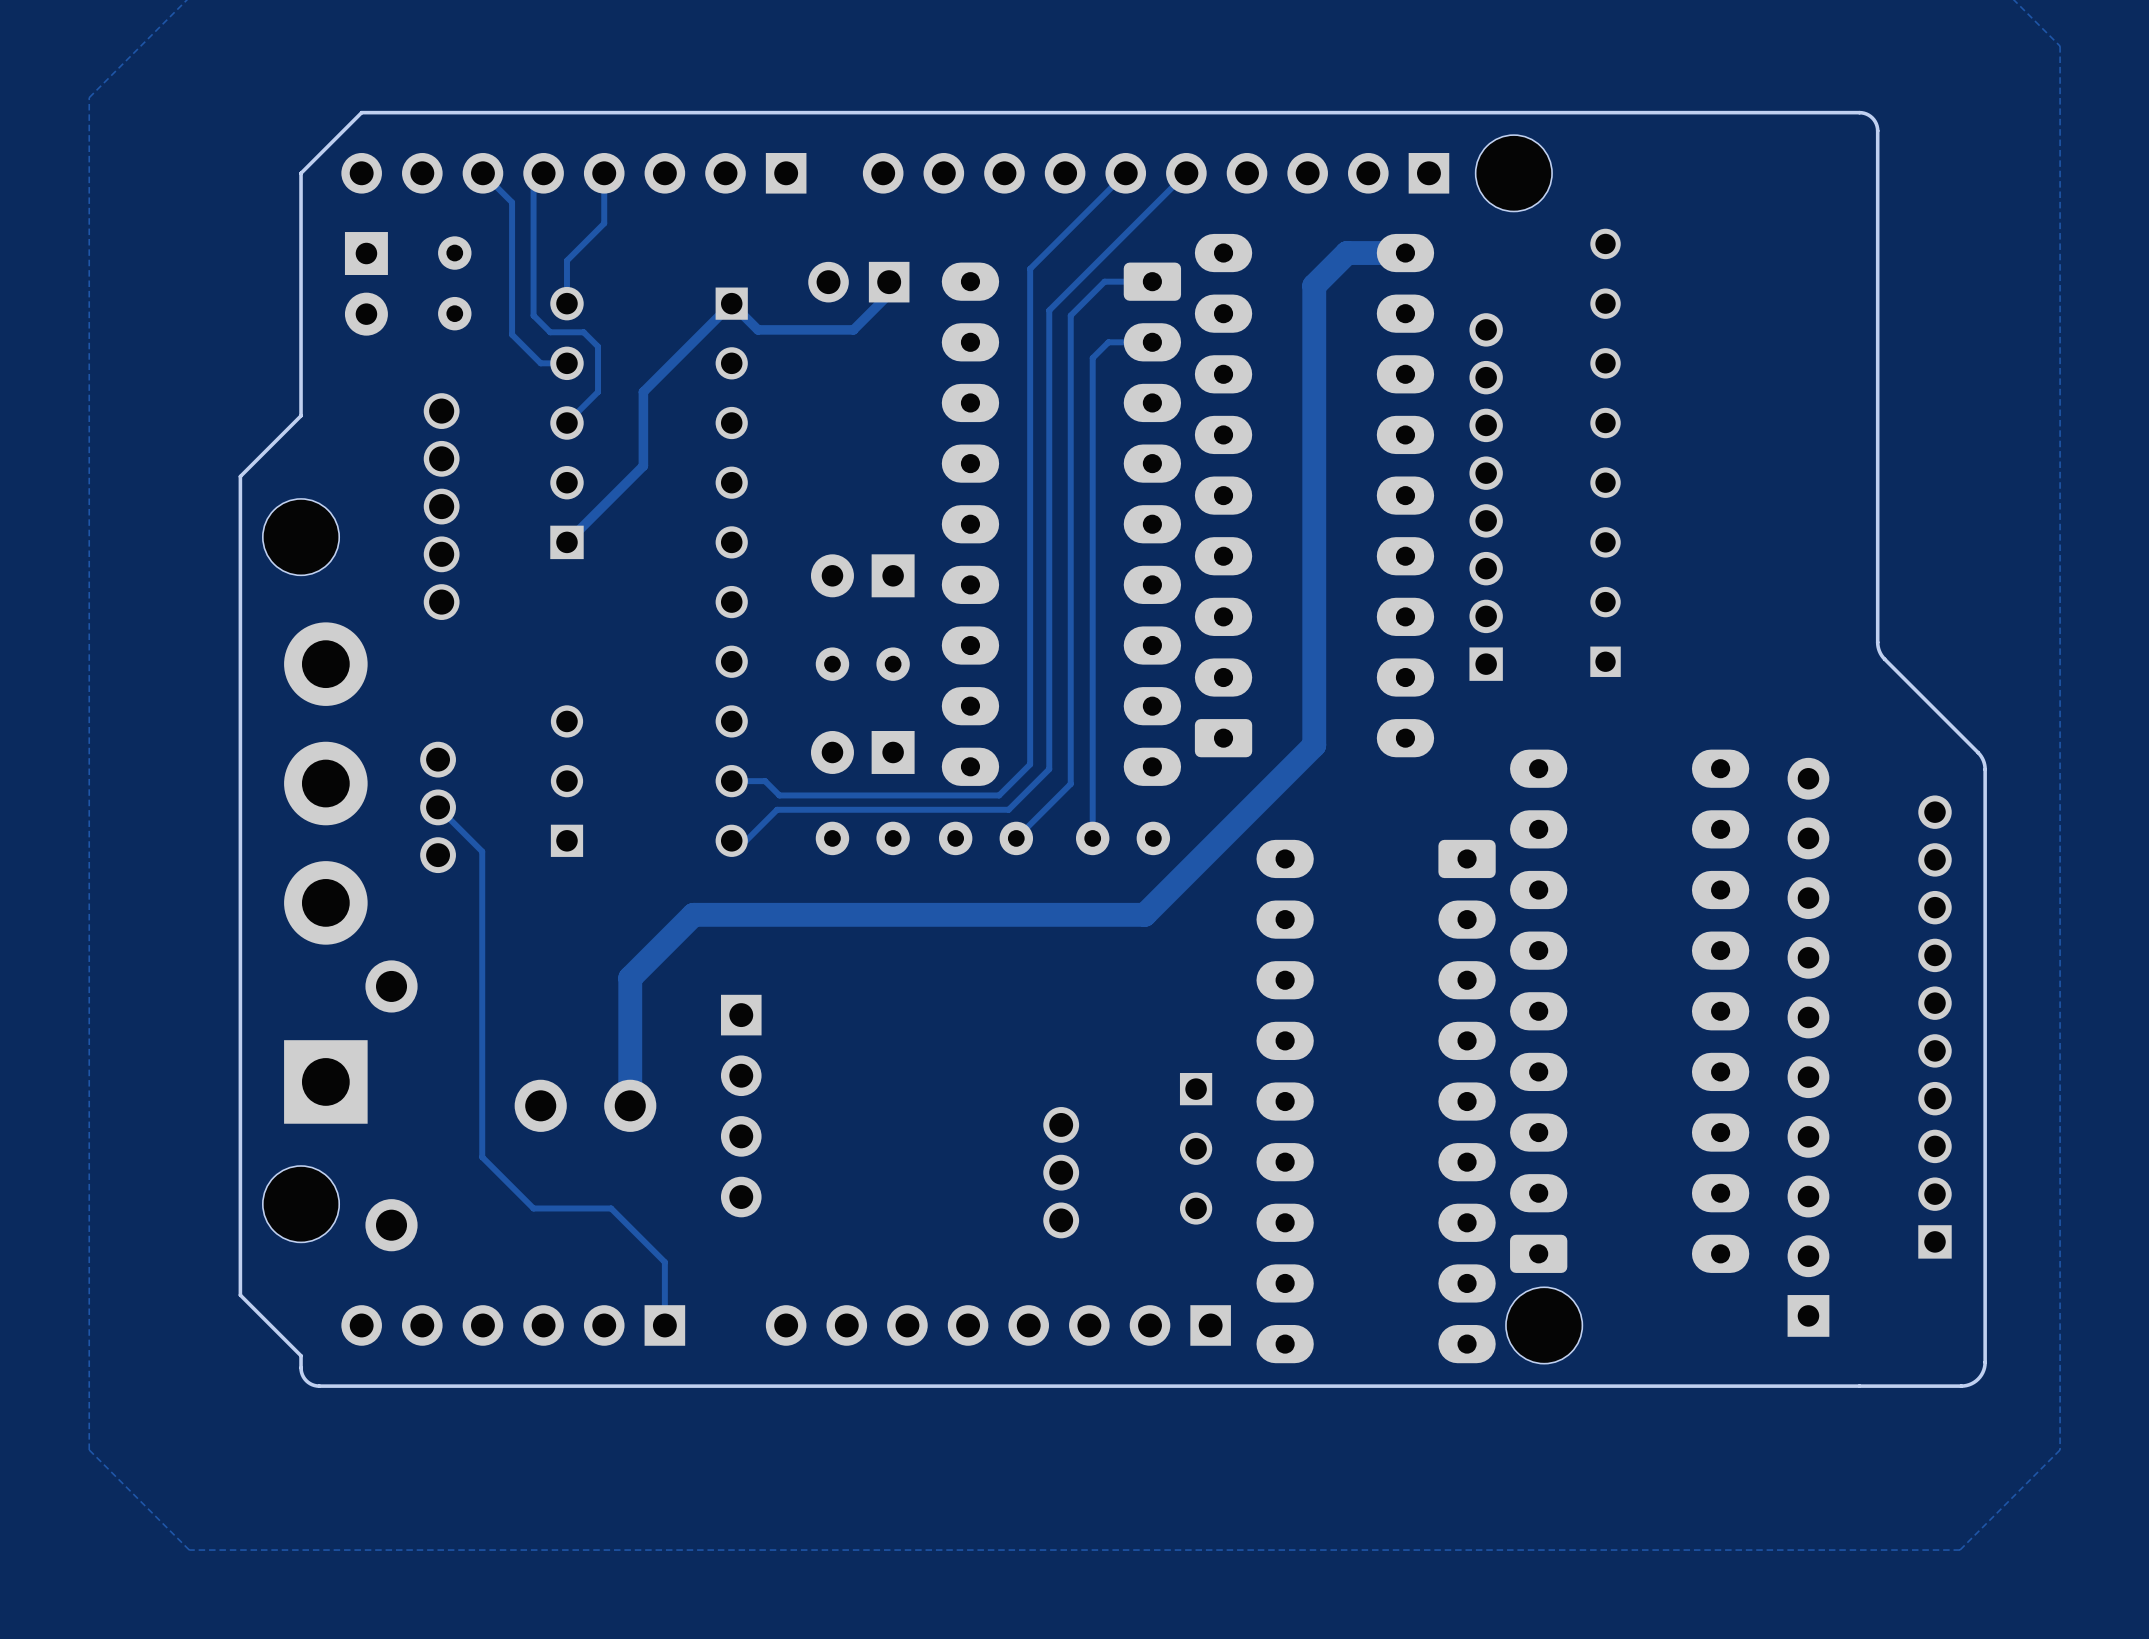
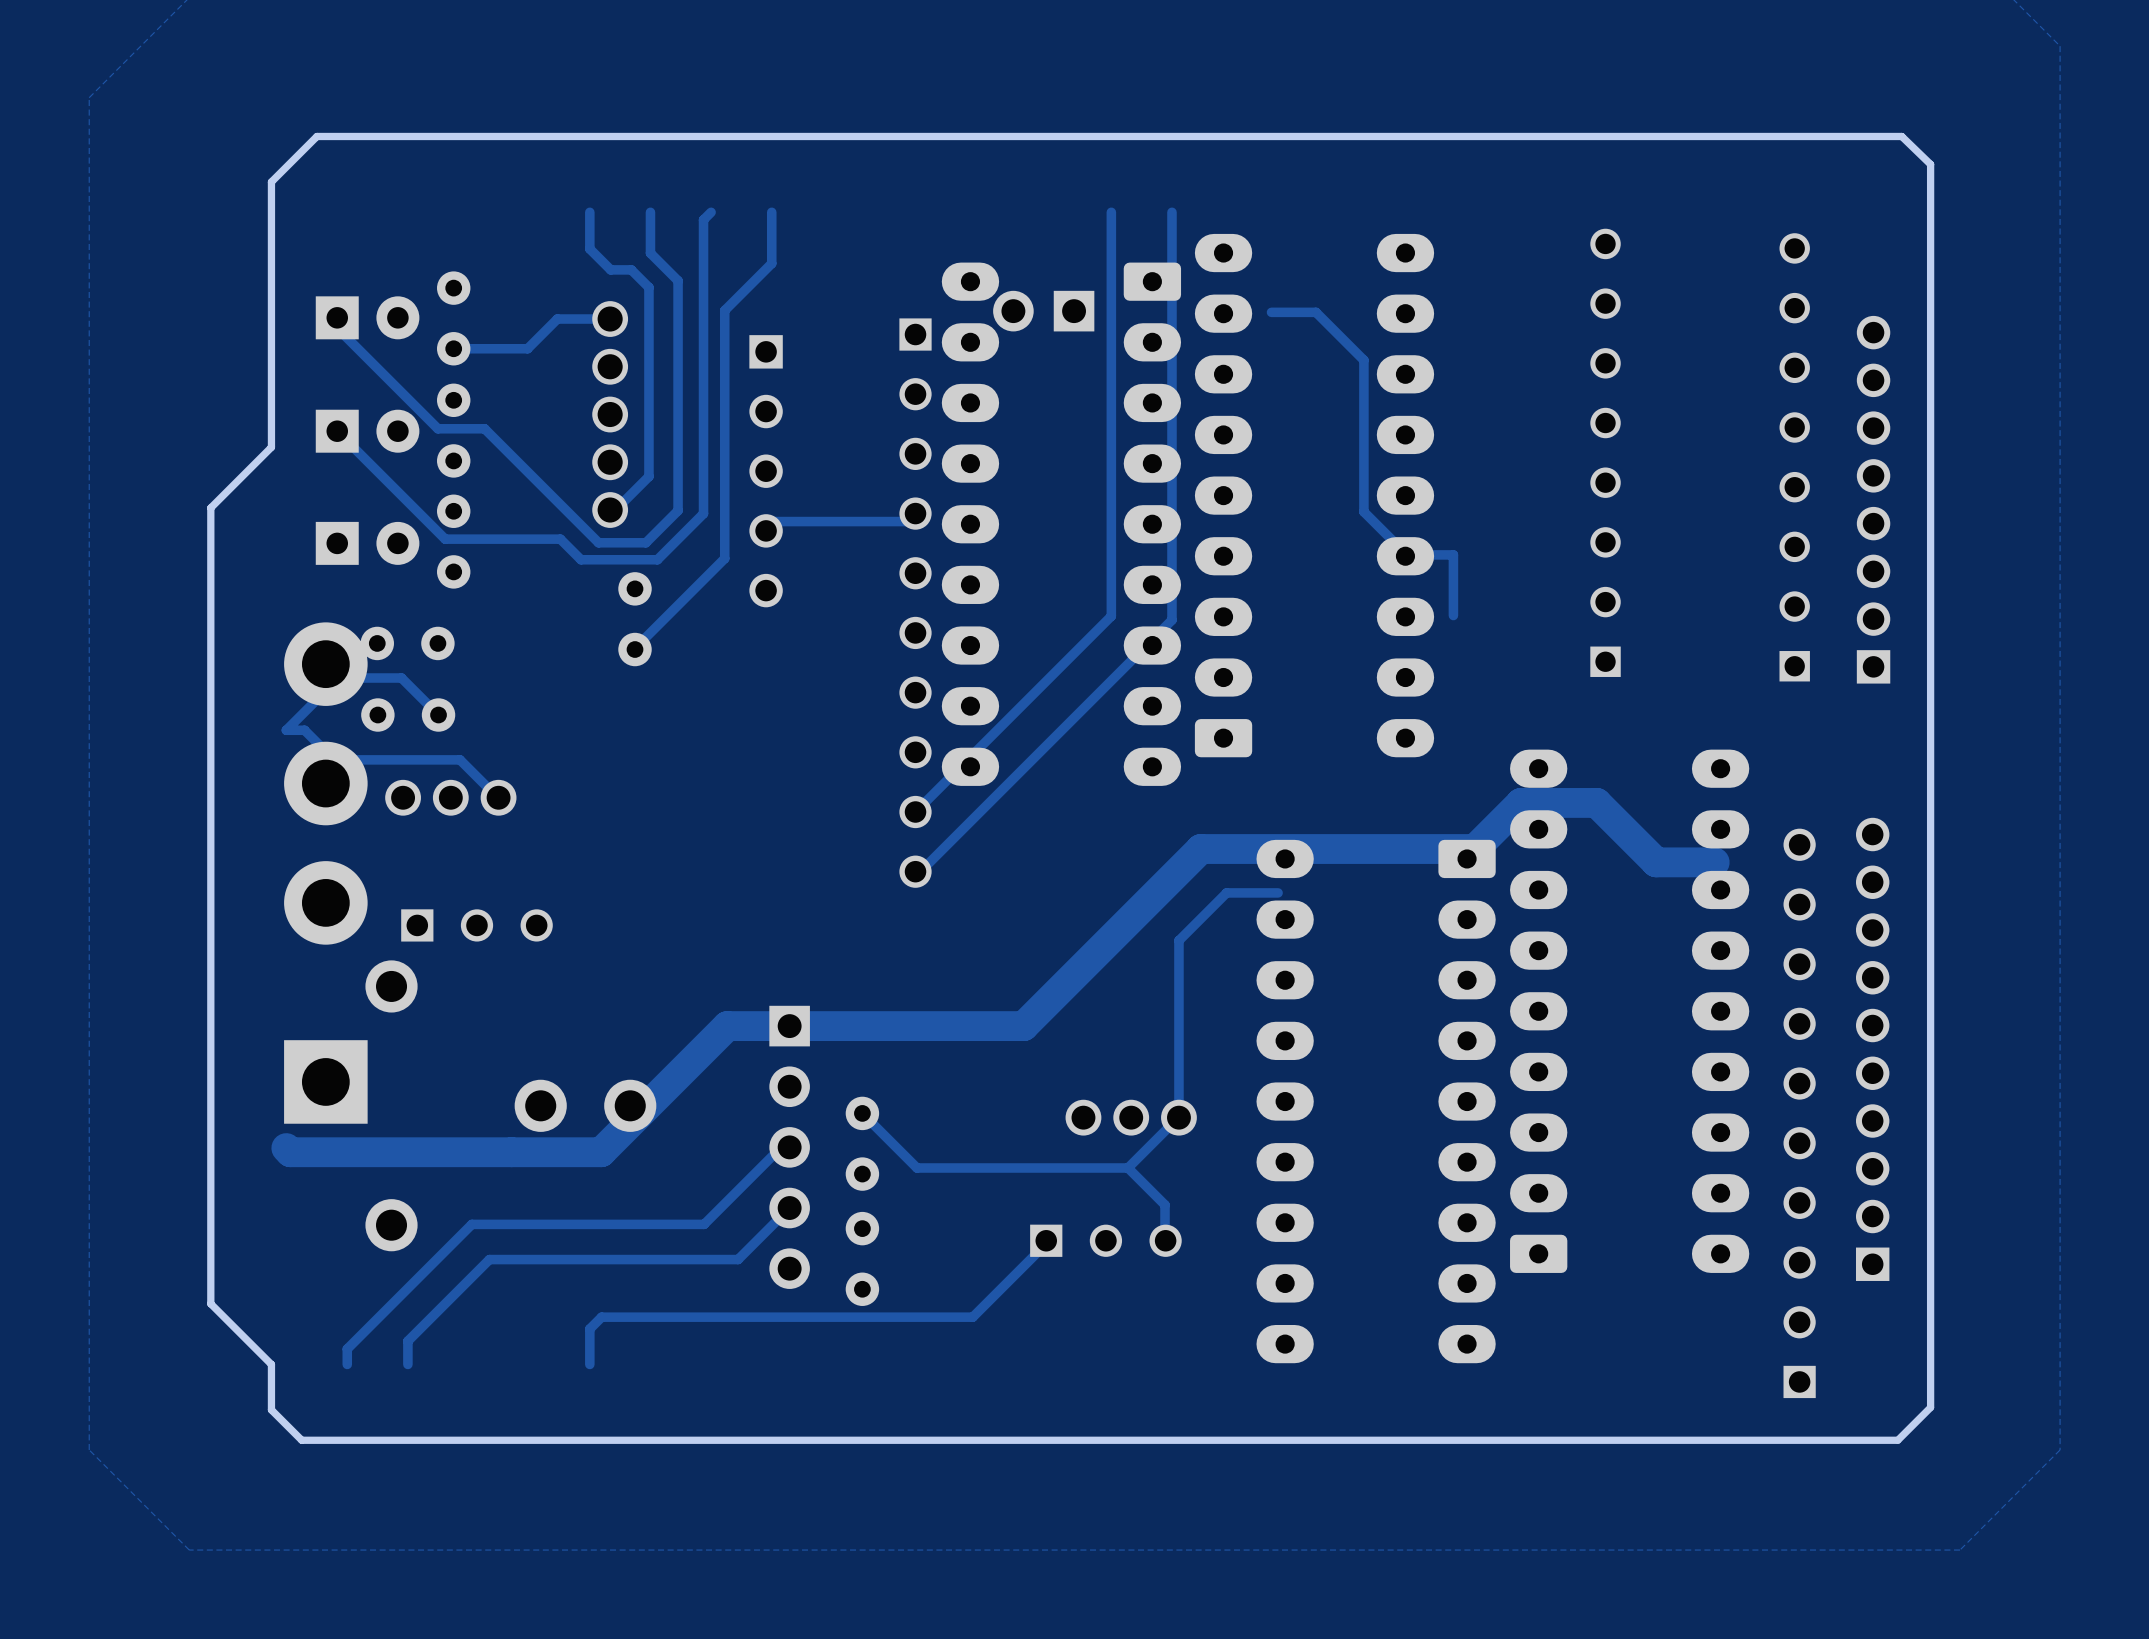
board edge: (1859, 112) (361, 112) (301, 173) (301, 415) (240, 476) (240, 1295) (301, 1355) (301, 1370) (304, 1379) (312, 1384) (319, 1386) (1961, 1386) (1976, 1380) (1982, 1372) (1985, 1362) (1985, 767) (1979, 754) (1884, 659) (1878, 646) (1877, 130) (1872, 117) (1859, 112) -> (1901, 136) (1930, 164) (1930, 1407) (1897, 1440) (301, 1440) (271, 1409) (271, 1364) (210, 1303) (210, 507) (271, 447) (271, 181) (316, 136) (1901, 136)
track: (482, 173) (512, 202) (512, 334) (540, 363) (566, 363) -> none
track: (543, 173) (533, 183) (533, 315) (550, 332) (583, 332) (598, 346) (598, 391) (566, 423) -> none
part: (573, 173) -> none
track: (604, 173) (604, 223) (566, 260) (566, 303) -> none
track: (1125, 173) (1030, 268) (1030, 764) (999, 795) (779, 795) (765, 781) (731, 781) -> none
part: (1156, 173) -> none
track: (1186, 173) (1049, 310) (1049, 769) (1008, 809) (777, 809) (741, 845) (726, 845) -> none
part: (1513, 173) -> none
track: none -> (589, 212) (589, 248) (610, 269) (631, 269) (648, 287) (648, 476) (615, 509)
track: none -> (650, 212) (650, 253) (678, 280) (678, 510) (645, 542) (598, 542) (484, 428) (437, 428) (337, 328) (337, 317)
track: none -> (711, 212) (703, 219) (703, 513) (657, 559) (581, 559) (560, 539) (445, 539) (337, 431)
track: none -> (771, 212) (771, 263) (724, 310) (724, 558) (635, 649)
track: none -> (1111, 212) (1111, 616) (915, 812)
track: none -> (1171, 212) (1171, 620) (920, 871) (915, 871)
track: (1405, 253) (1346, 253) (1314, 285) (1314, 745) (1144, 914) (693, 914) (630, 978) (630, 1105) -> none
track: (1152, 281) (1104, 281) (1070, 315) (1070, 784) (1016, 838) -> none
part position: (858, 282) -> (1043, 311)
track: (889, 282) (889, 294) (853, 329) (757, 329) (731, 303) (643, 391) (643, 465) (566, 542) -> none
part rotation: 0° (366, 283) -> 90° counterclockwise (367, 317)
part position: (454, 283) -> (453, 318)
track: none -> (1271, 312) (1316, 312) (1363, 360) (1363, 511) (1406, 554) (1453, 554) (1453, 615)
track: none -> (615, 319) (557, 319) (527, 348) (453, 348)
track: (1152, 342) (1108, 342) (1092, 358) (1092, 838) -> none
part rotation: 0° (566, 423) -> 180° (766, 471)
part position: (566, 423) -> (766, 471)
part: none -> (453, 430)
part: none -> (367, 431)
part: none -> (1794, 457)
part position: (1486, 497) -> (1873, 499)
part position: (441, 506) -> (610, 414)
track: none -> (915, 513) (907, 521) (775, 521) (766, 530)
part: (301, 537) -> none
part: none -> (453, 541)
part: none -> (367, 543)
part position: (731, 572) -> (915, 603)
part: (862, 575) -> none
part: none -> (635, 619)
part: none -> (407, 643)
part: (862, 664) -> none
part: none -> (408, 715)
track: none -> (438, 715) (401, 678) (338, 678) (286, 730) (304, 730) (334, 759) (460, 759) (498, 798)
part: (862, 752) -> none
part rotation: 0° (566, 781) -> 90° clockwise (476, 925)
part position: (566, 781) -> (476, 925)
track: (438, 807) (482, 851) (482, 1157) (533, 1208) (611, 1208) (664, 1262) (664, 1325) -> none
part rotation: 0° (438, 807) -> 90° clockwise (450, 797)
part: (862, 838) -> none
part: (985, 838) -> none
part: (1123, 838) -> none
track: none -> (1714, 862) (1656, 862) (1596, 802) (1520, 802) (1474, 849) (1200, 849) (1023, 1026) (727, 1026) (601, 1152) (290, 1152) (286, 1148)
track: none -> (1278, 892) (1226, 892) (1178, 940) (1178, 1117) (1128, 1168)
part position: (1935, 1027) -> (1872, 1049)
part: (1808, 1047) -> none
part: (741, 1106) -> none
track: none -> (862, 1113) (916, 1168) (1128, 1168)
part: none -> (1799, 1113)
part: none -> (862, 1143)
track: none -> (789, 1147) (781, 1147) (704, 1224) (471, 1224) (347, 1349) (347, 1364)
part: none -> (789, 1147)
part rotation: 0° (1196, 1148) -> 90° counterclockwise (1105, 1240)
part position: (1196, 1148) -> (1105, 1240)
track: none -> (1128, 1168) (1165, 1204) (1165, 1240)
part rotation: 0° (1061, 1172) -> 90° clockwise (1131, 1117)
part position: (1061, 1172) -> (1131, 1117)
part: (301, 1204) -> none
track: none -> (789, 1208) (738, 1259) (489, 1259) (407, 1341) (407, 1364)
track: none -> (1046, 1240) (1046, 1243) (972, 1317) (601, 1317) (589, 1329) (589, 1364)
part: none -> (862, 1258)
part: (513, 1325) -> none
part: (998, 1325) -> none
part: (1544, 1325) -> none

